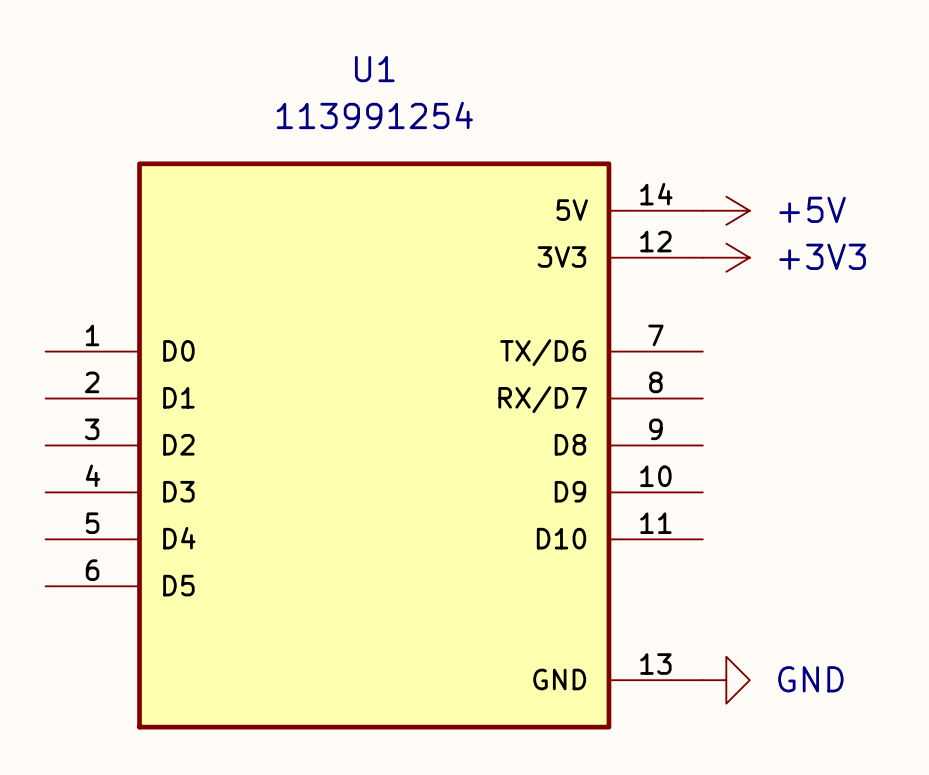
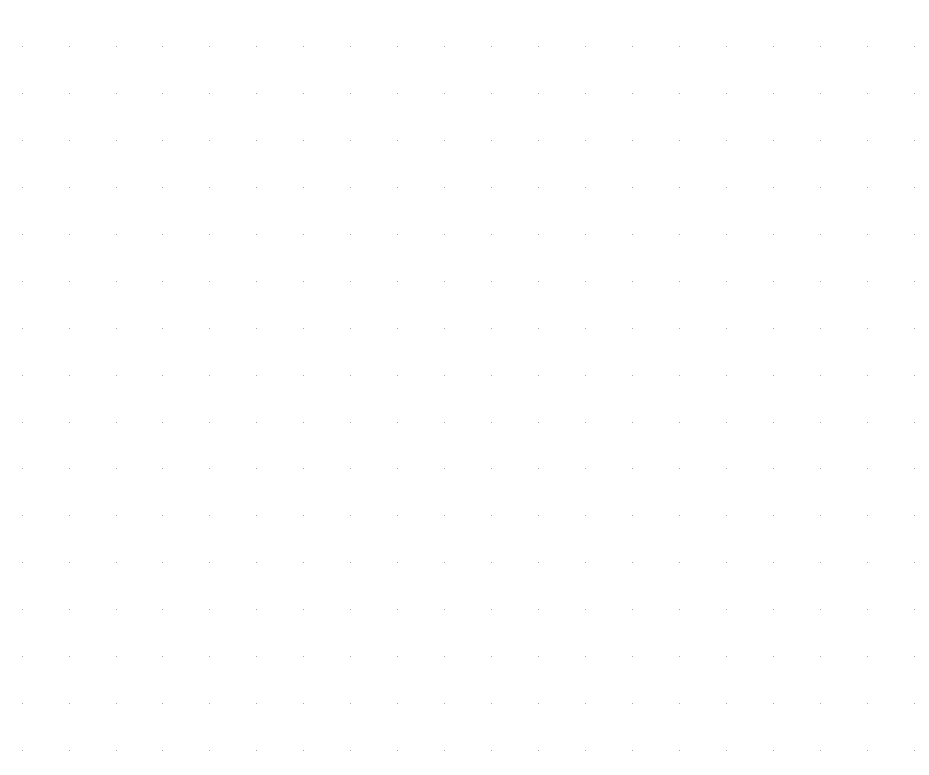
power symbol: +5V (726, 210) -> none
power symbol: +3V3 (726, 257) -> none
U1: 113991254 (374, 445) -> none
power symbol: GND (726, 680) -> none

